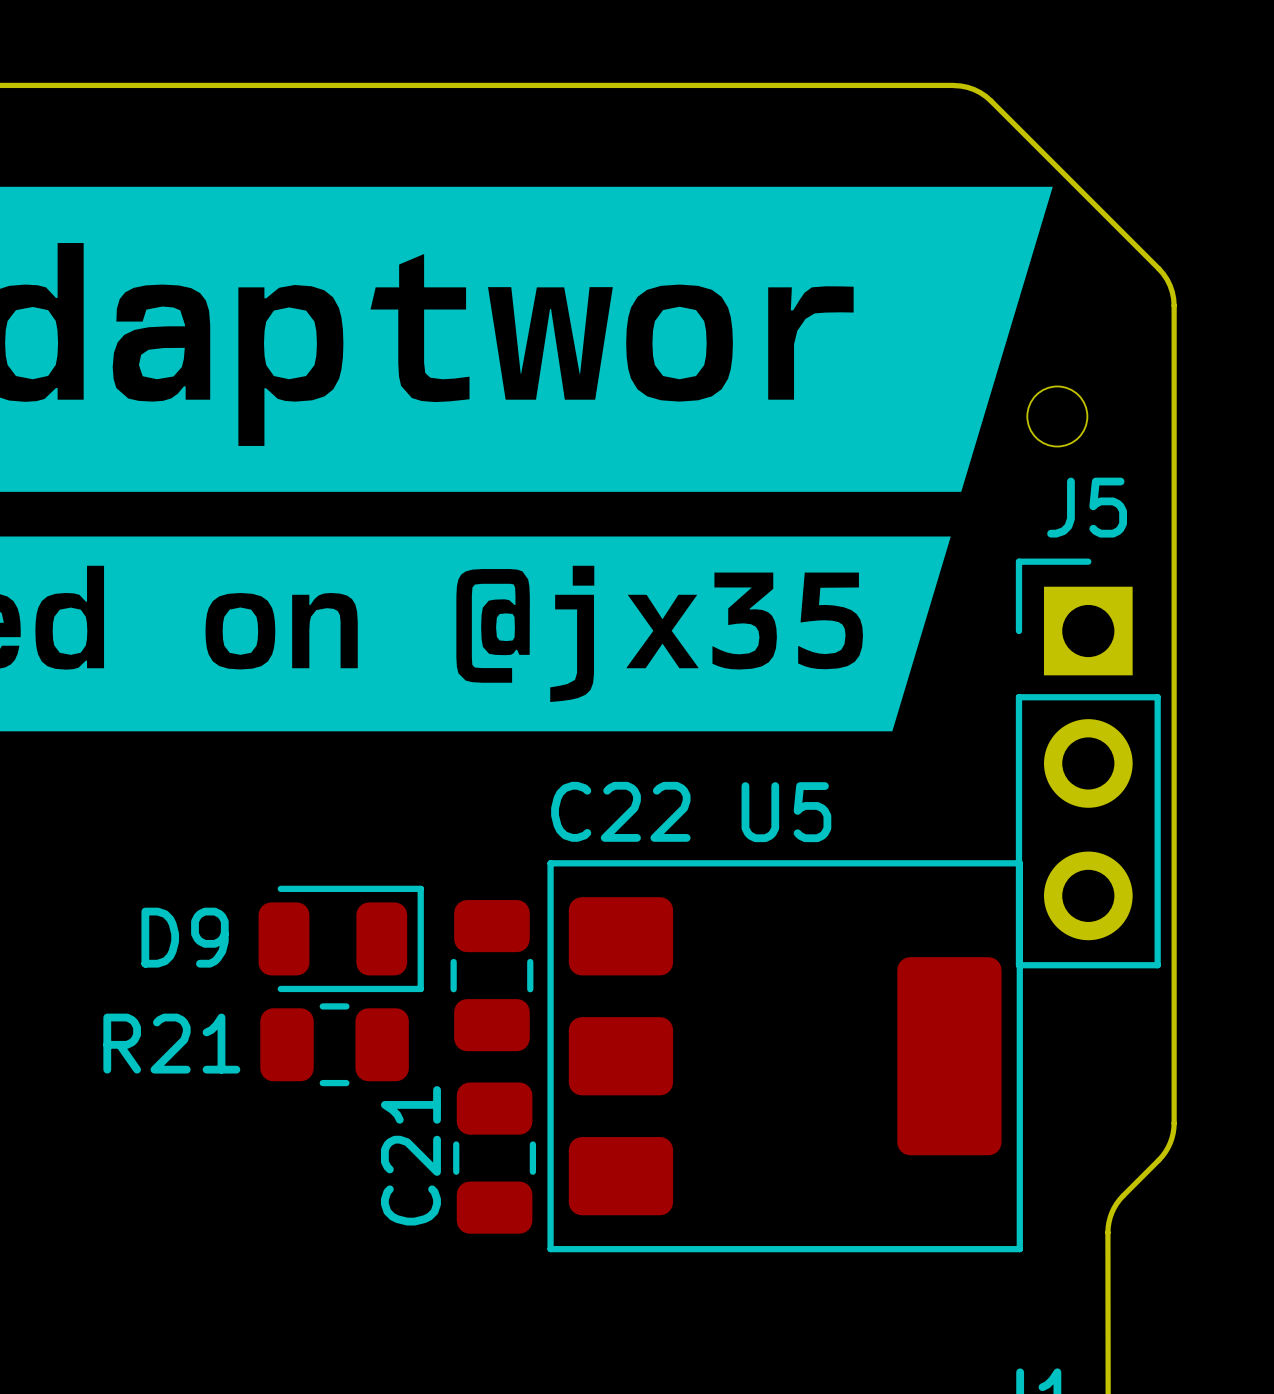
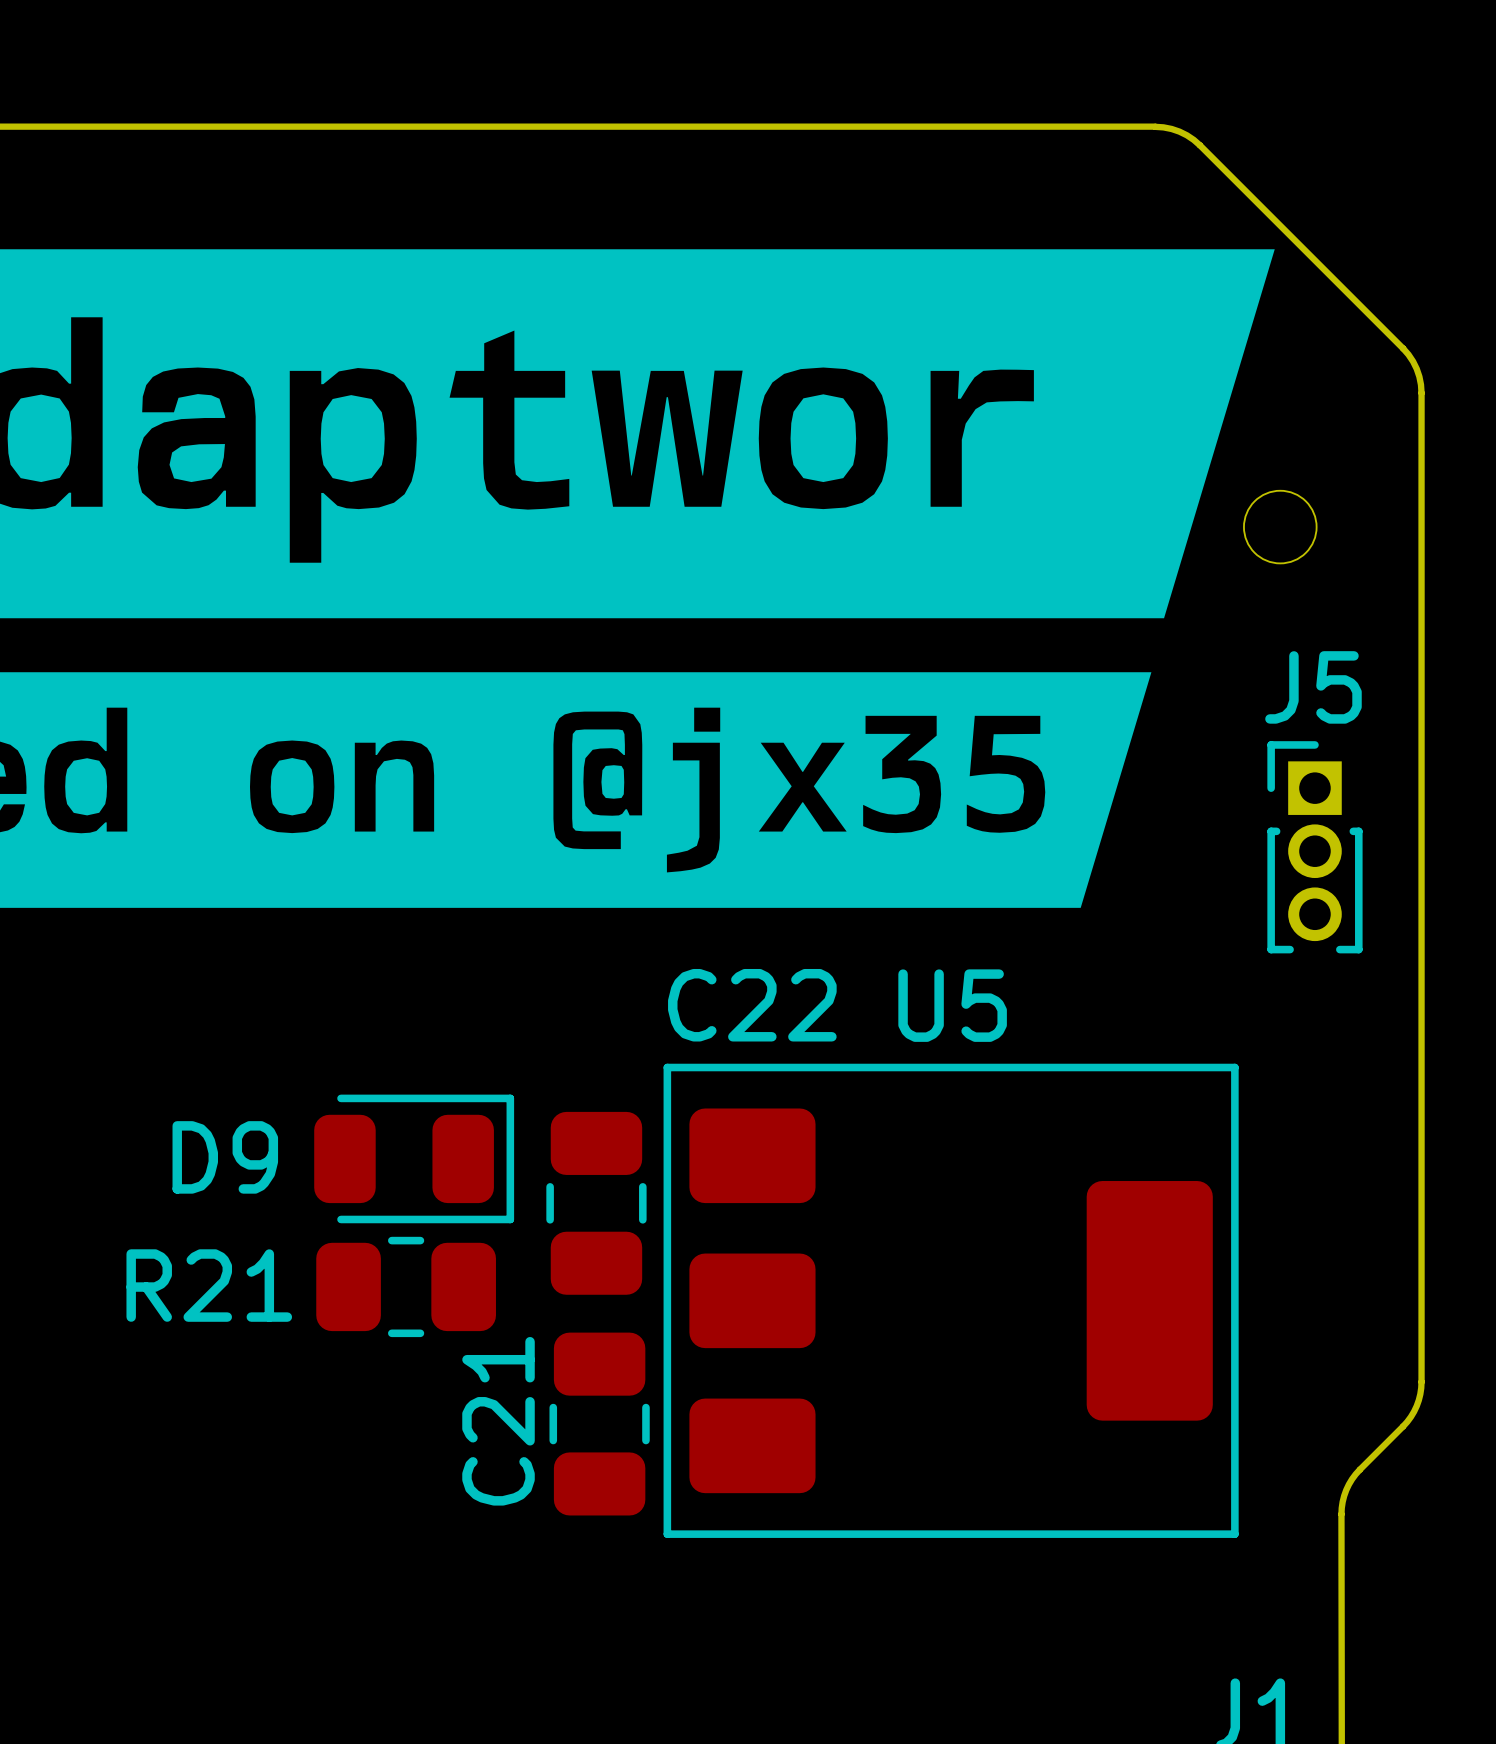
J5 name position: J5 (1087, 507) -> J5 (1313, 687)
J5 footprint: [1015, 558, 1161, 969] -> [1267, 741, 1363, 954]

